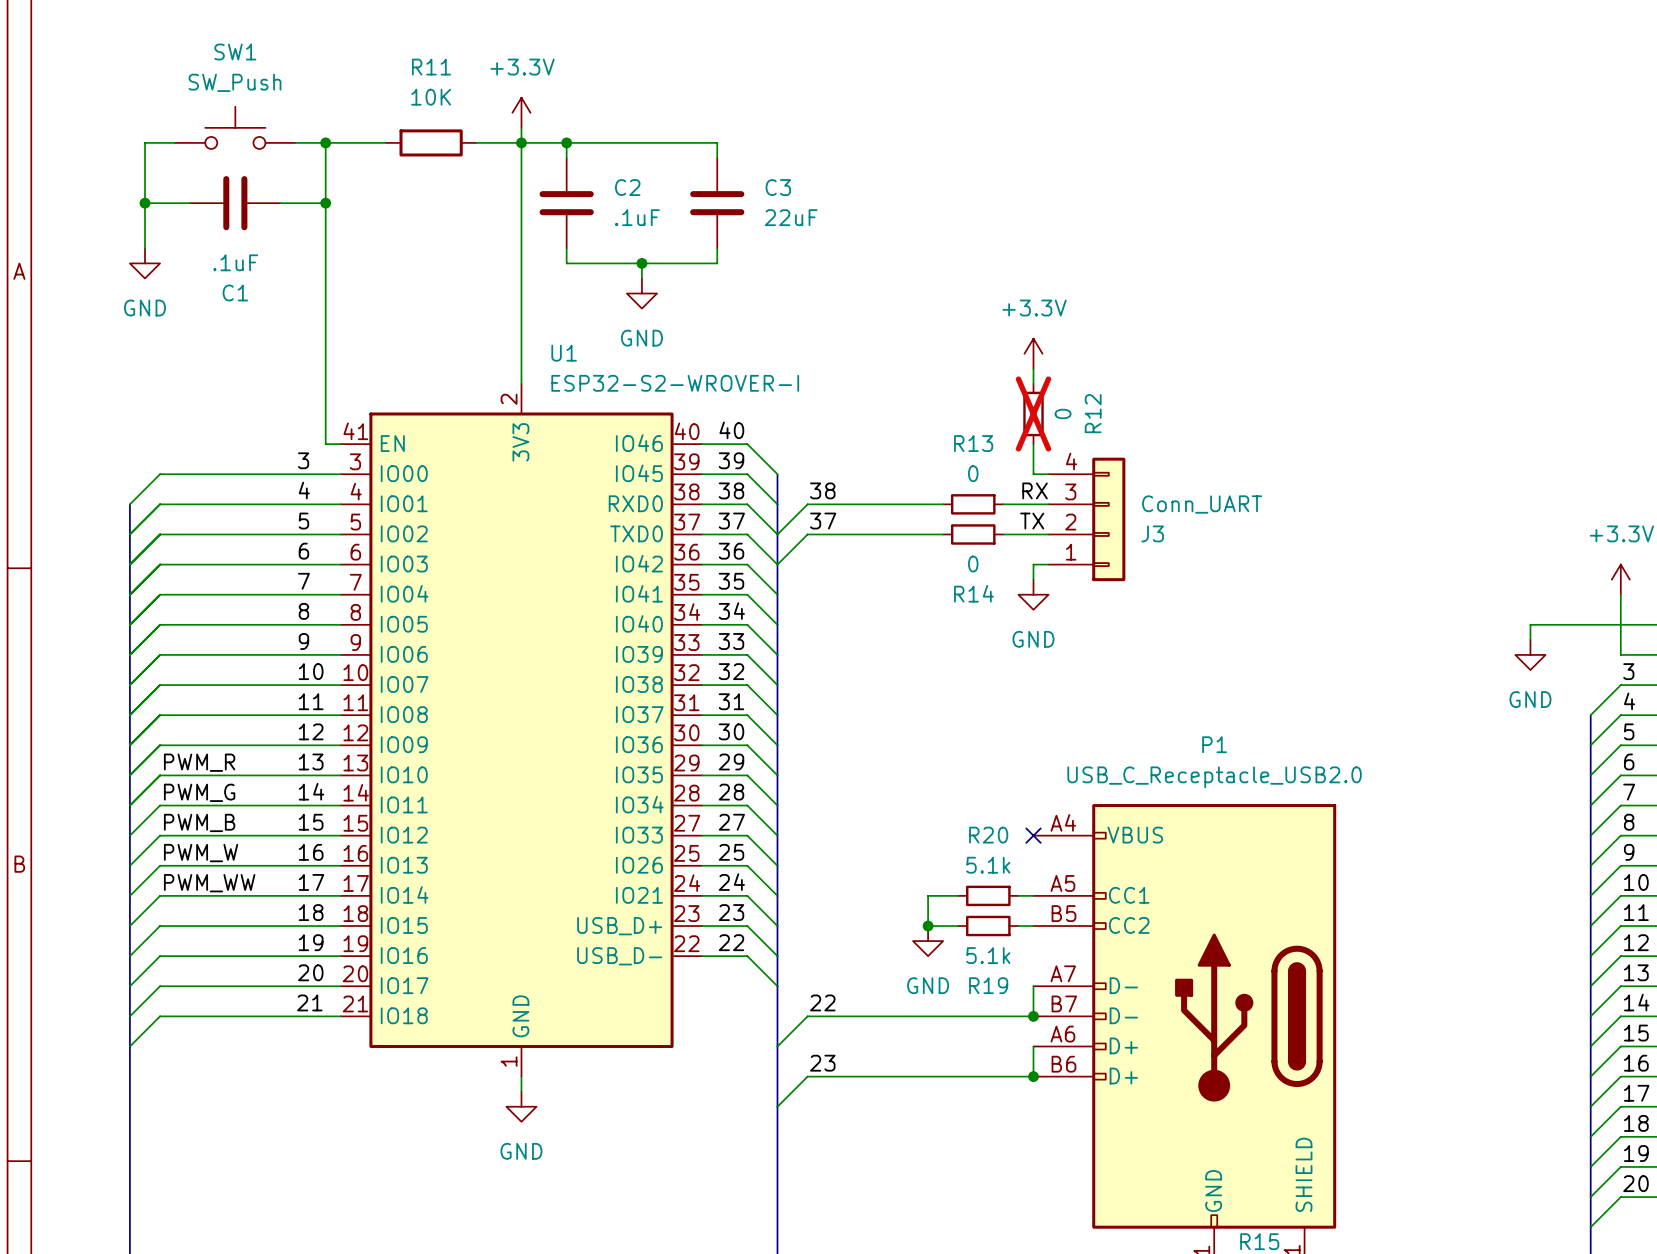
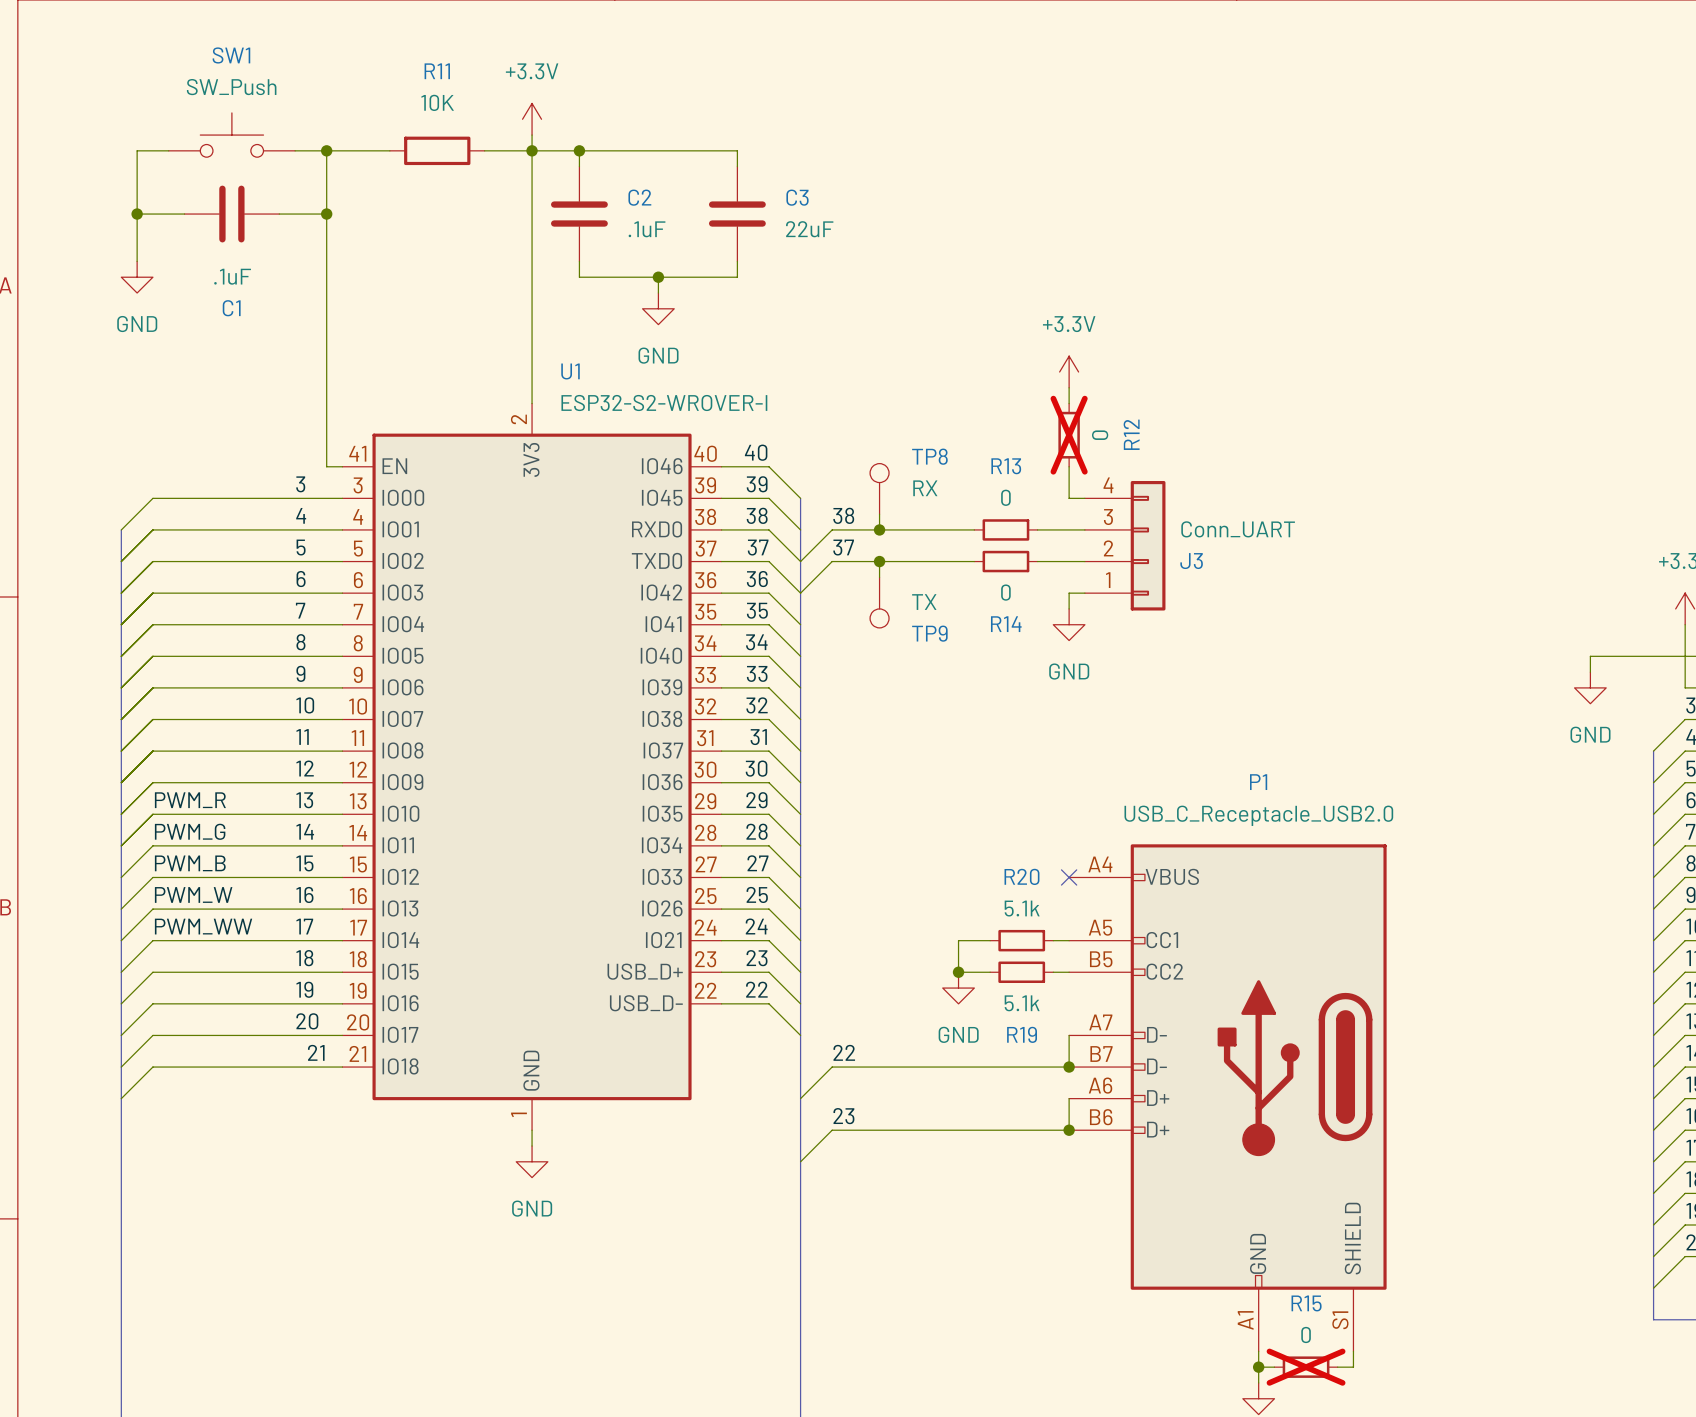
TP8: none -> RX (879, 488)
wire: none -> (879, 514) (879, 529)
label: RX (1035, 490) -> none
junction: none -> (879, 529)
label: TX (1032, 521) -> none
wire: none -> (879, 561) (879, 577)
junction: none -> (879, 561)
TP9: none -> TX (879, 602)

